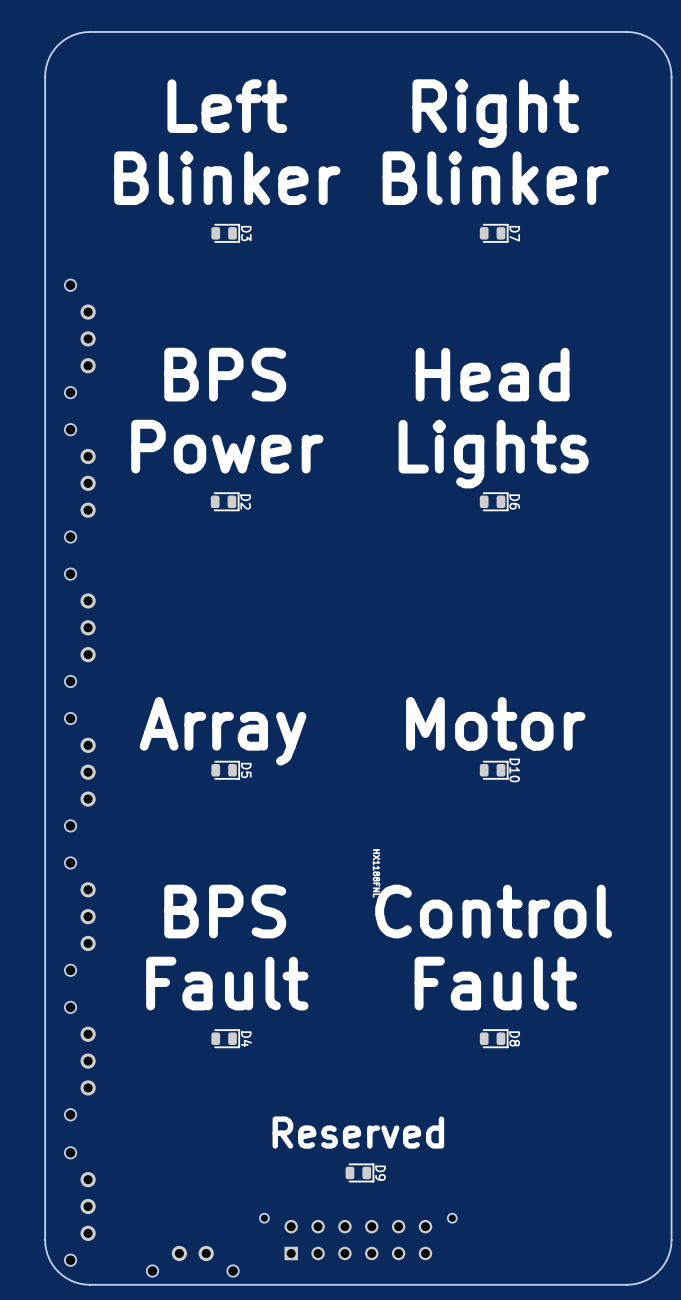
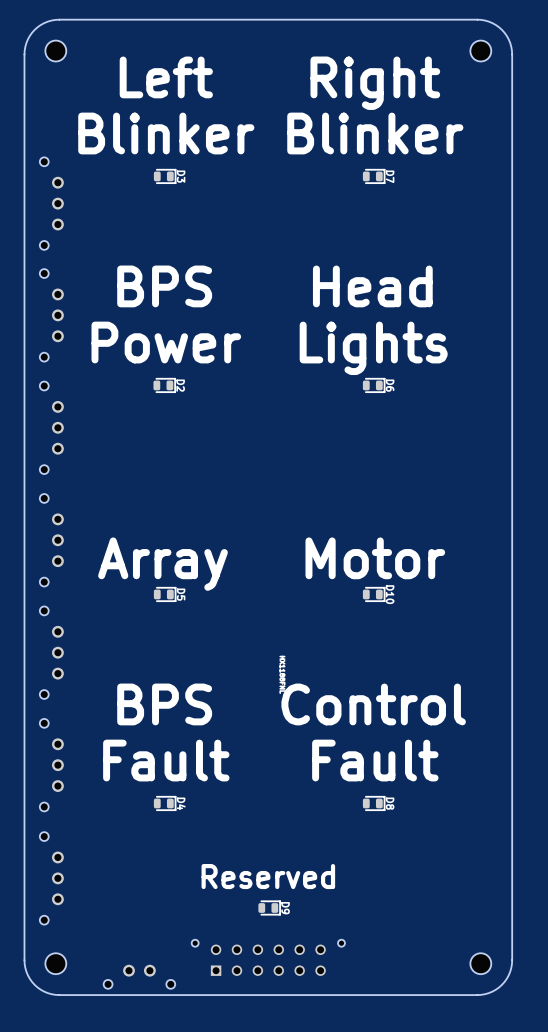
part: none -> (55, 51)
part: none -> (480, 51)
part: none -> (51, 203)
part: (80, 338) -> none
part: none -> (51, 315)
part: (80, 483) -> none
part: none -> (51, 427)
part: (80, 627) -> none
part: none -> (51, 540)
part: (80, 772) -> none
part: none -> (51, 652)
part: (80, 916) -> none
part: none -> (51, 765)
part: (80, 1061) -> none
part: none -> (51, 878)
part: (80, 1206) -> none
part: none -> (55, 963)
part: none -> (480, 963)

